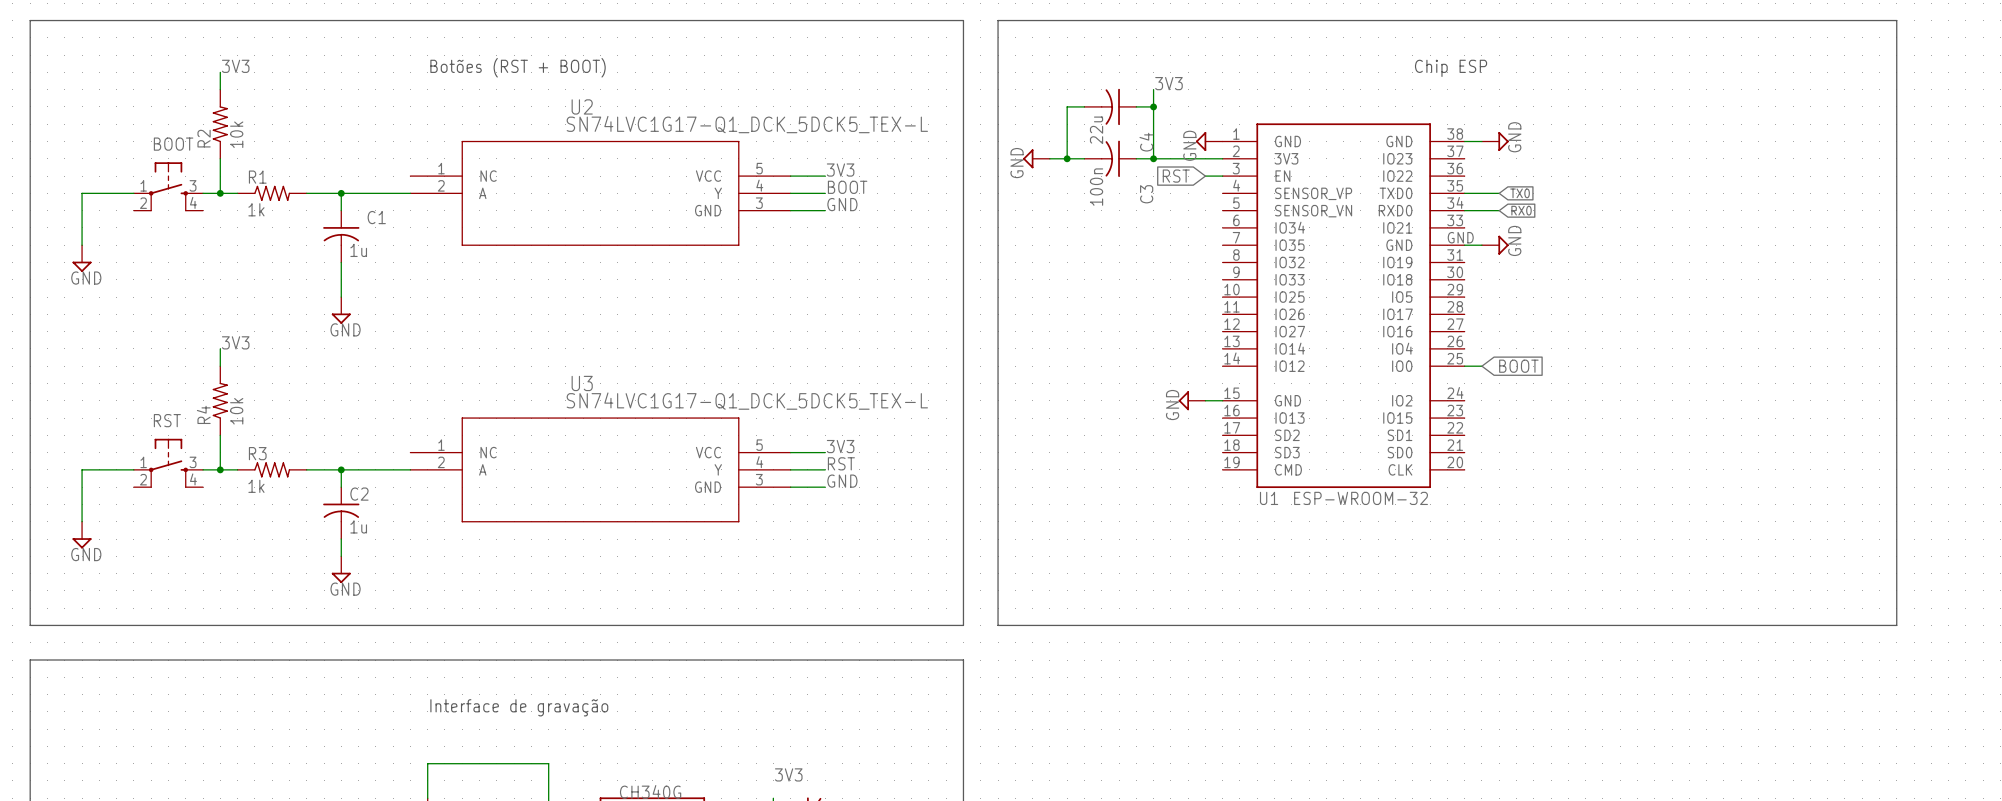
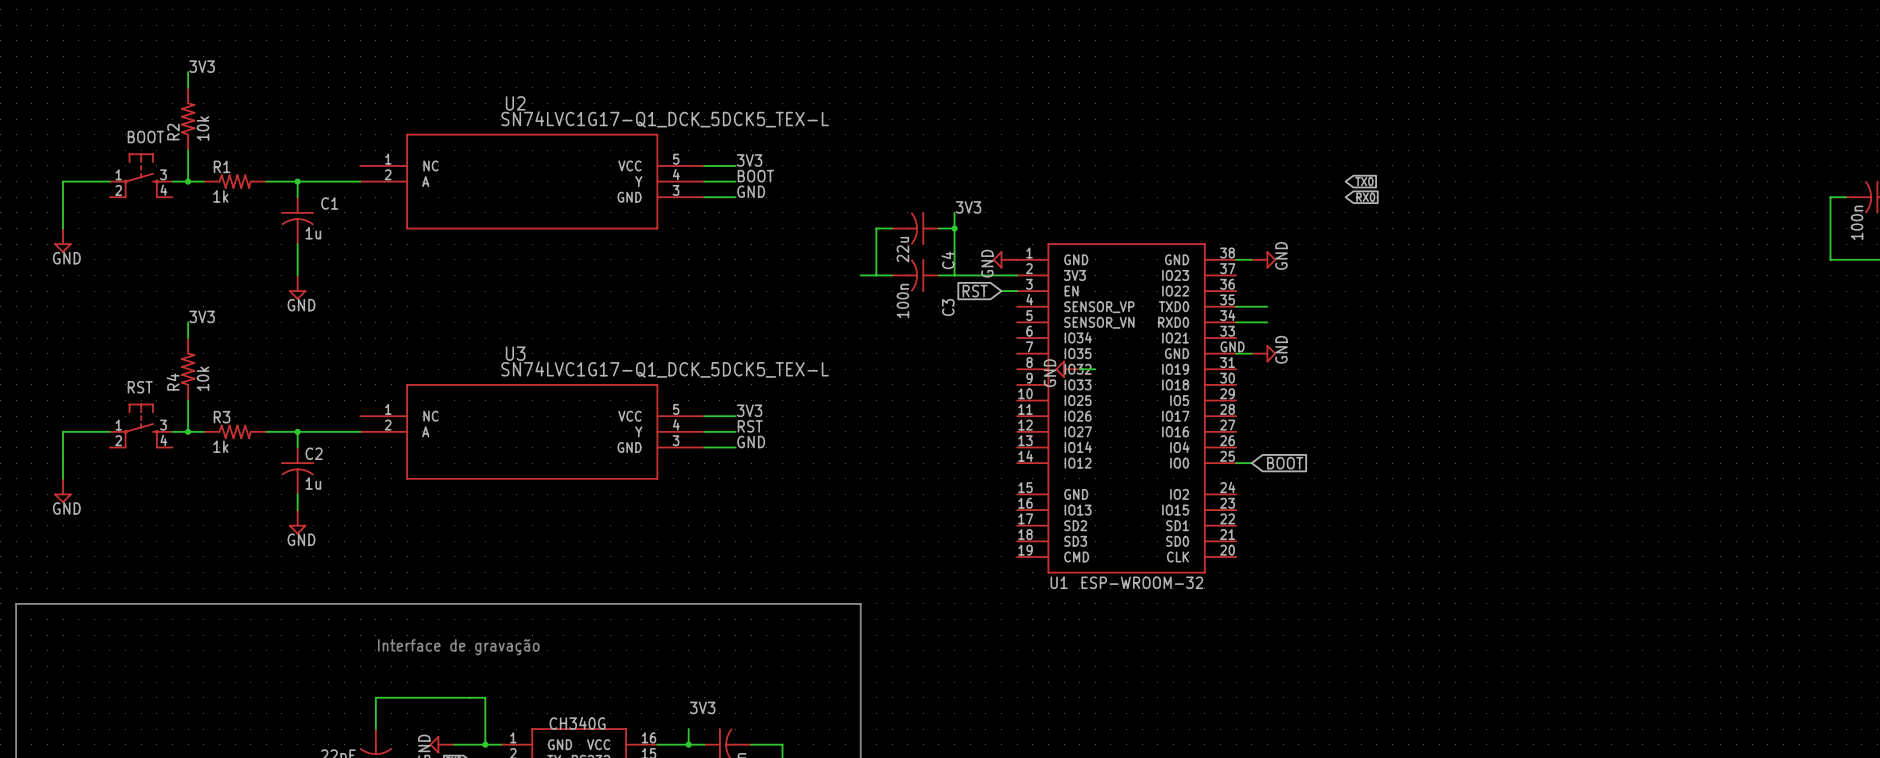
line: (30, 20) (30, 625) (963, 625) (963, 20) (30, 20) -> none
line: (998, 20) (1896, 20) (1896, 625) (998, 625) (998, 20) -> none
text: Botões (RST + BOOT) (518, 67) -> none
text: Chip ESP (1451, 68) -> none
label position: 3V3 (1168, 83) -> 3V3 (968, 207)
wire: (1153, 89) (1153, 158) -> (954, 212) (954, 275)
wire: (1084, 106) (1067, 106) (1067, 158) -> (892, 228) (876, 228) (876, 275)
C4 position: (1110, 106) -> (915, 228)
wire: (1136, 106) (1153, 106) -> (938, 228) (954, 228)
junction: (1153, 106) -> none
power symbol: GND (1209, 141) -> none
wire: (1464, 141) (1481, 141) -> (1236, 259) (1251, 259)
power symbol: GND (1495, 141) -> none
power symbol: GND (1036, 158) -> none
wire: (1049, 158) (1084, 158) -> (860, 275) (892, 275)
junction: (1067, 158) -> none
C3 position: (1110, 158) -> (915, 275)
wire: (1136, 158) (1222, 158) -> (938, 275) (1017, 275)
junction: (1153, 158) -> none
global label position: RST (1176, 176) -> RST (975, 291)
wire: (1205, 176) (1222, 176) -> (1001, 291) (1017, 291)
wire: (1464, 193) (1499, 193) -> (1236, 306) (1267, 306)
wire: (1464, 210) (1499, 210) -> (1236, 322) (1267, 322)
junction: none -> (954, 228)
wire: (1464, 245) (1481, 245) -> (1236, 353) (1251, 353)
power symbol: GND (1495, 245) -> none
power symbol: none -> GND (1005, 259)
power symbol: none -> GND (1263, 259)
U1 position: (1343, 305) -> (1126, 408)
wire: (1464, 366) (1481, 366) -> (1236, 463) (1251, 463)
global label position: BOOT (1518, 366) -> BOOT (1285, 463)
power symbol: none -> GND (1263, 353)

